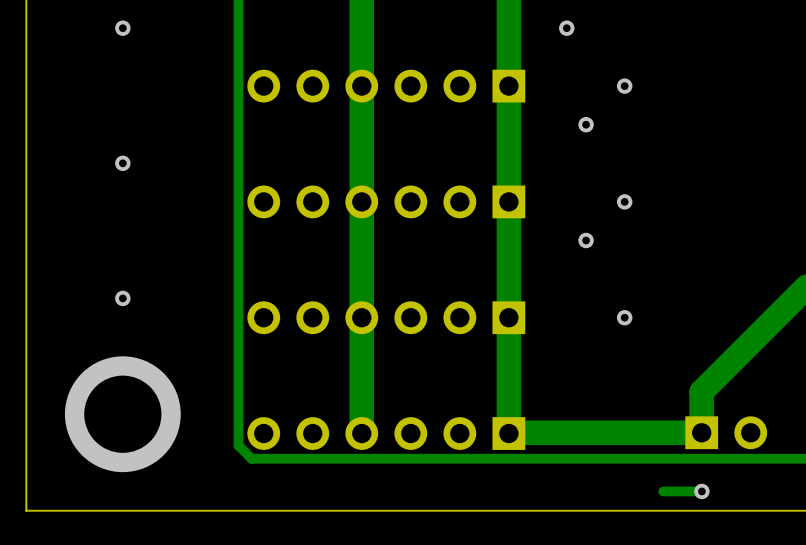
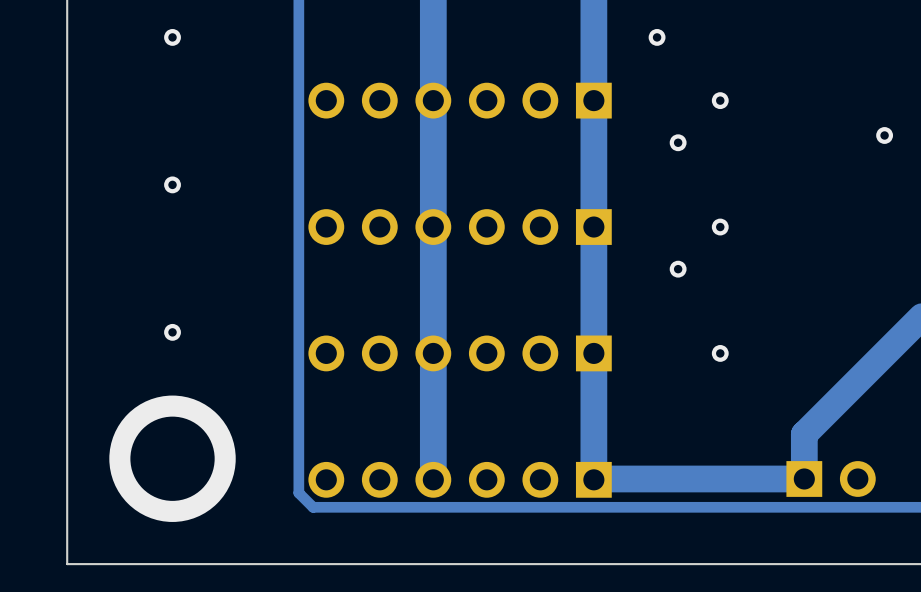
via: none -> (884, 135)
track: (701, 491) (663, 491) -> none
via: (701, 491) -> none

